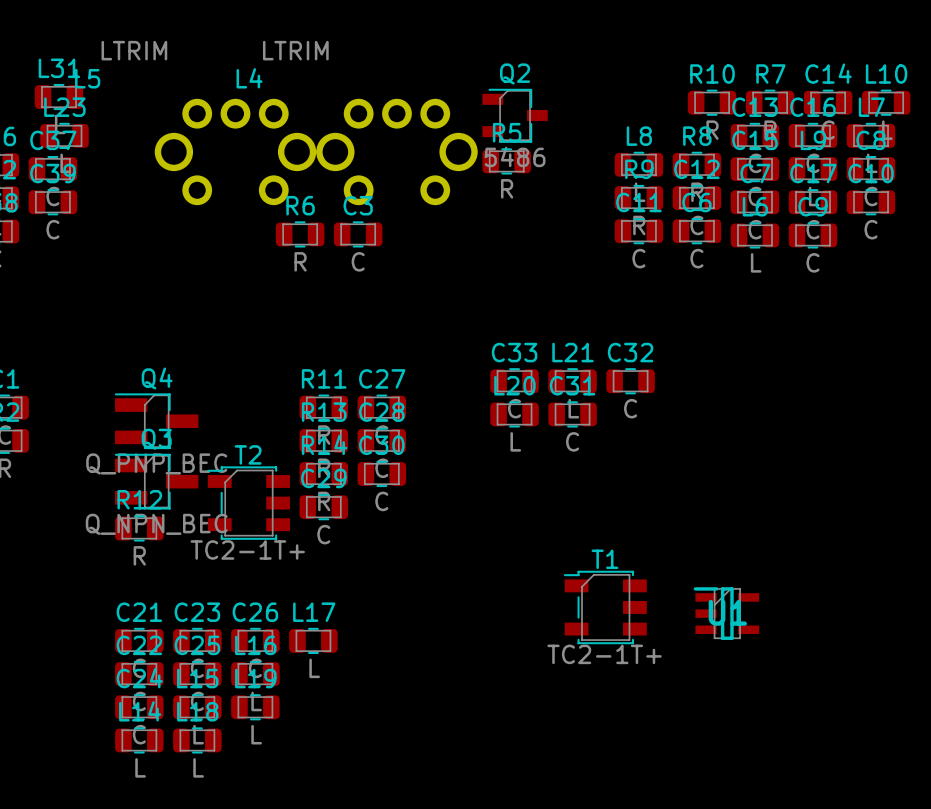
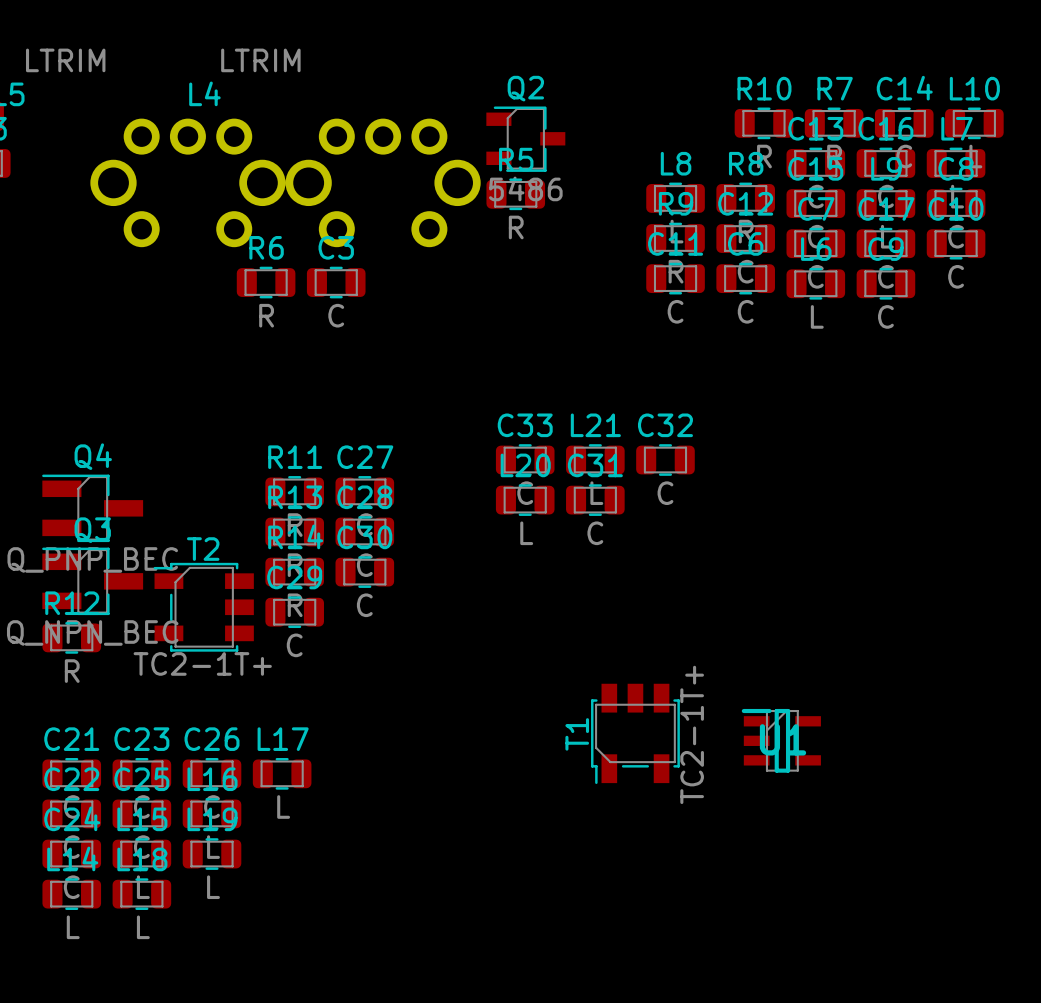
T1 rotation: 0° (605, 607) -> 90° counterclockwise (635, 733)

